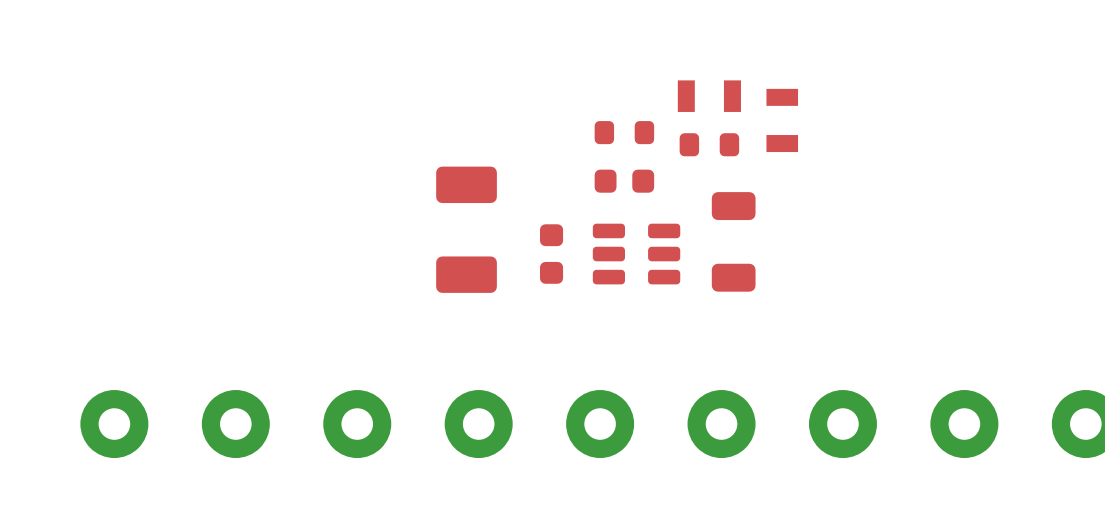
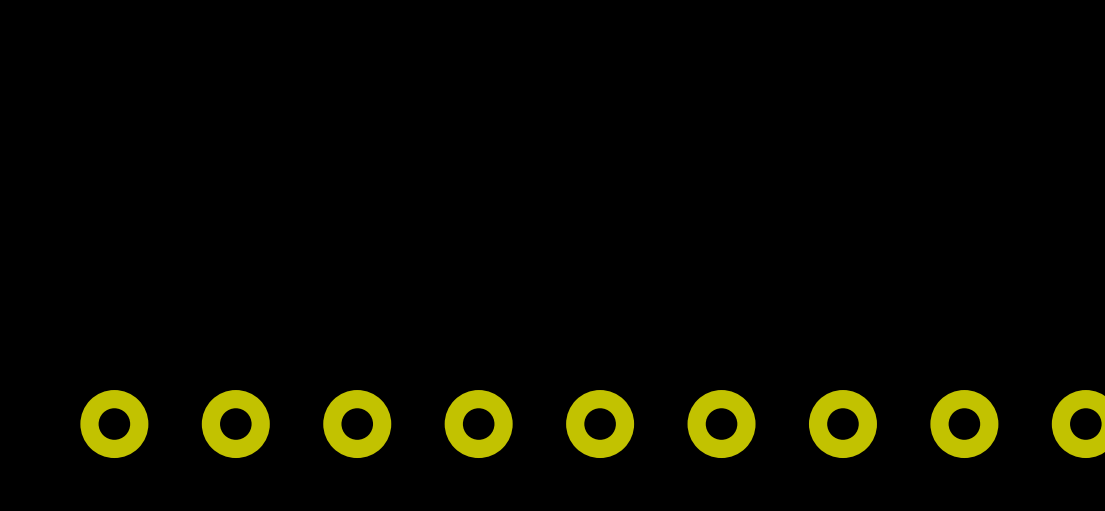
part: (709, 96) -> none
part: (782, 120) -> none
part: (624, 132) -> none
part: (709, 144) -> none
part: (624, 181) -> none
part: (466, 229) -> none
part: (733, 241) -> none
part: (551, 254) -> none
part: (636, 254) -> none

